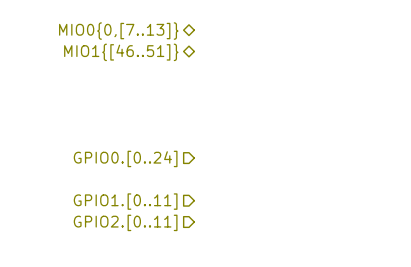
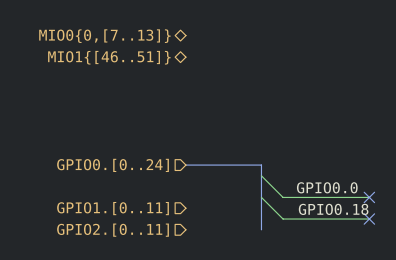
bus: none -> (185, 165) (261, 165) (261, 229)
wire: none -> (261, 175) (283, 197) (369, 197)
label: none -> GPIO0.0 (327, 187)
wire: none -> (261, 197) (283, 219) (369, 219)
no-connect mark: none -> (369, 197)
label: none -> GPIO0.18 (333, 209)
no-connect mark: none -> (369, 219)

